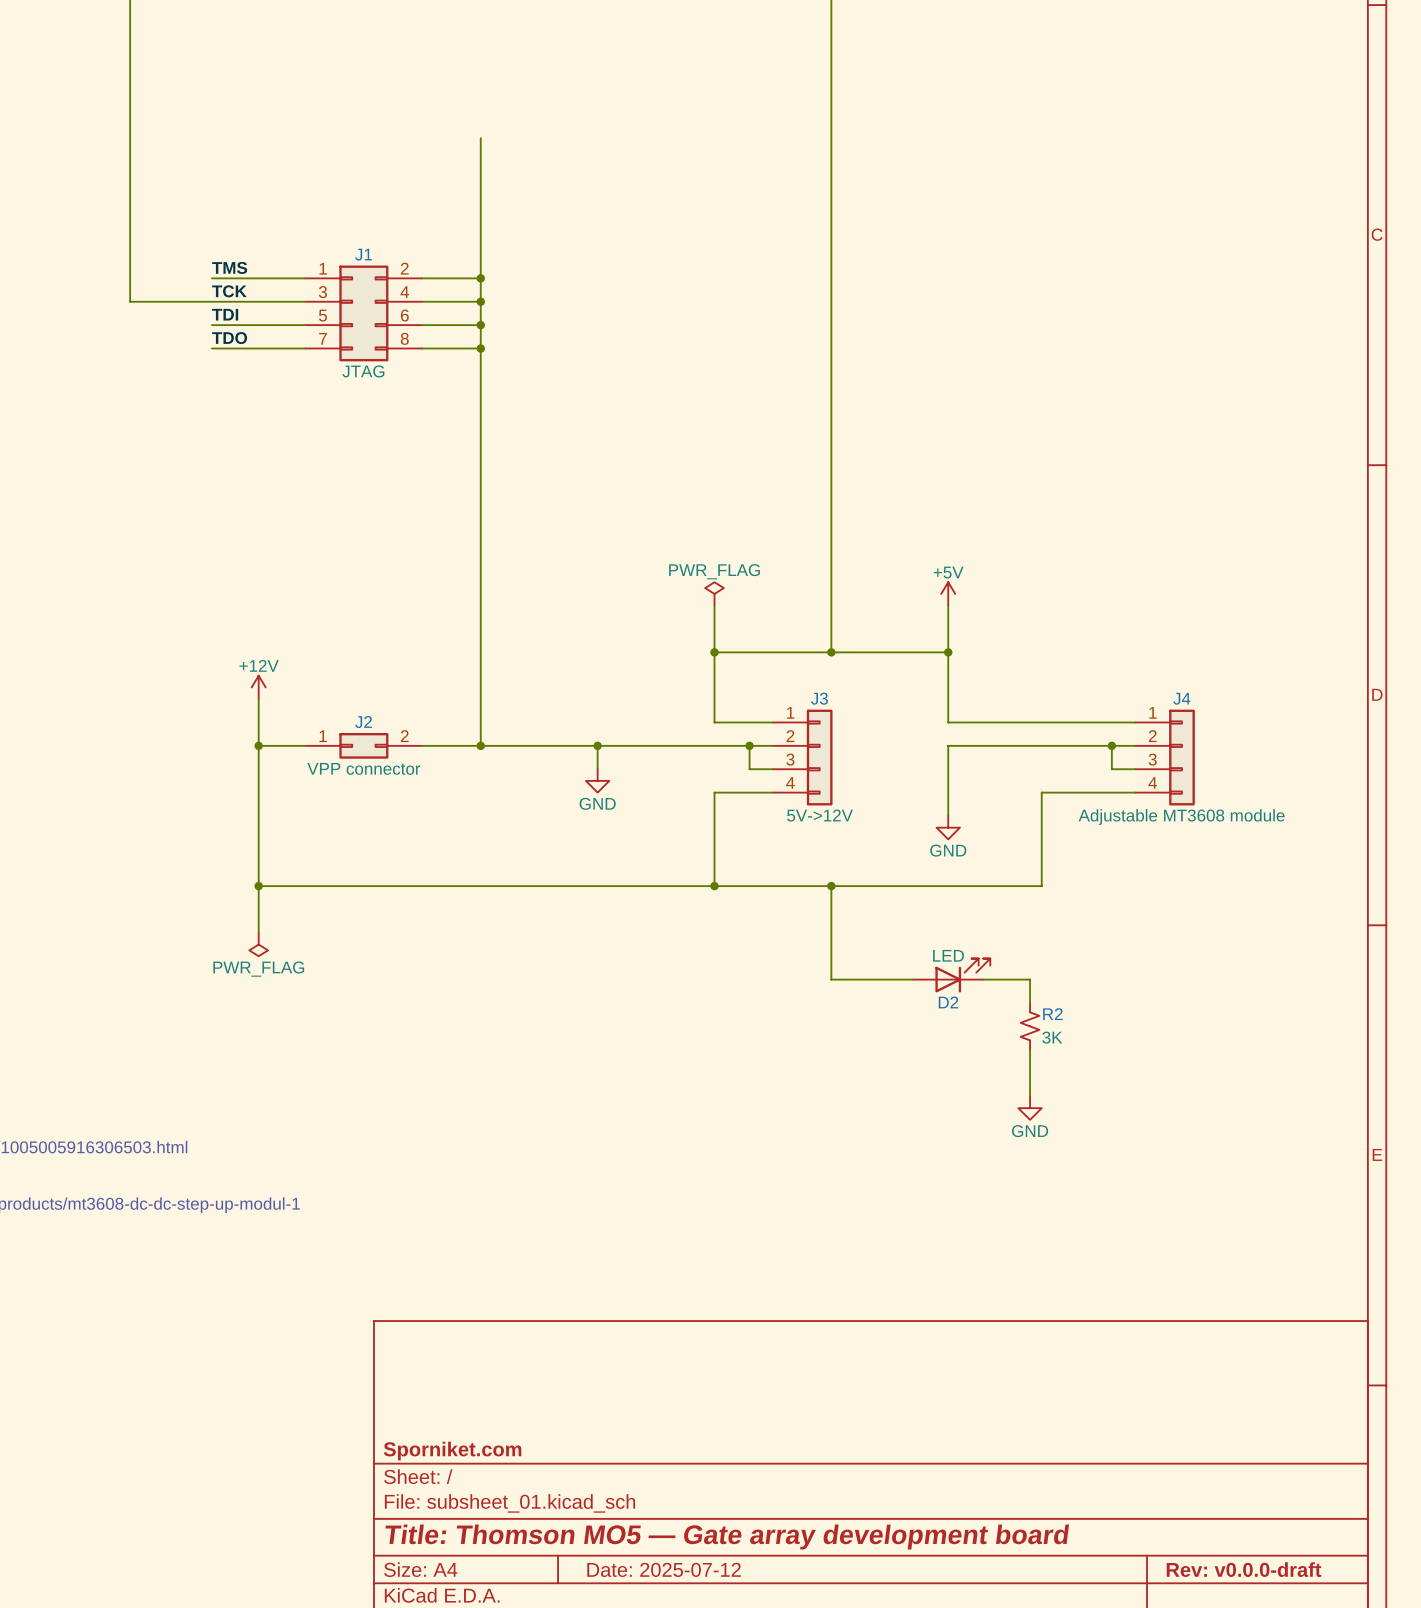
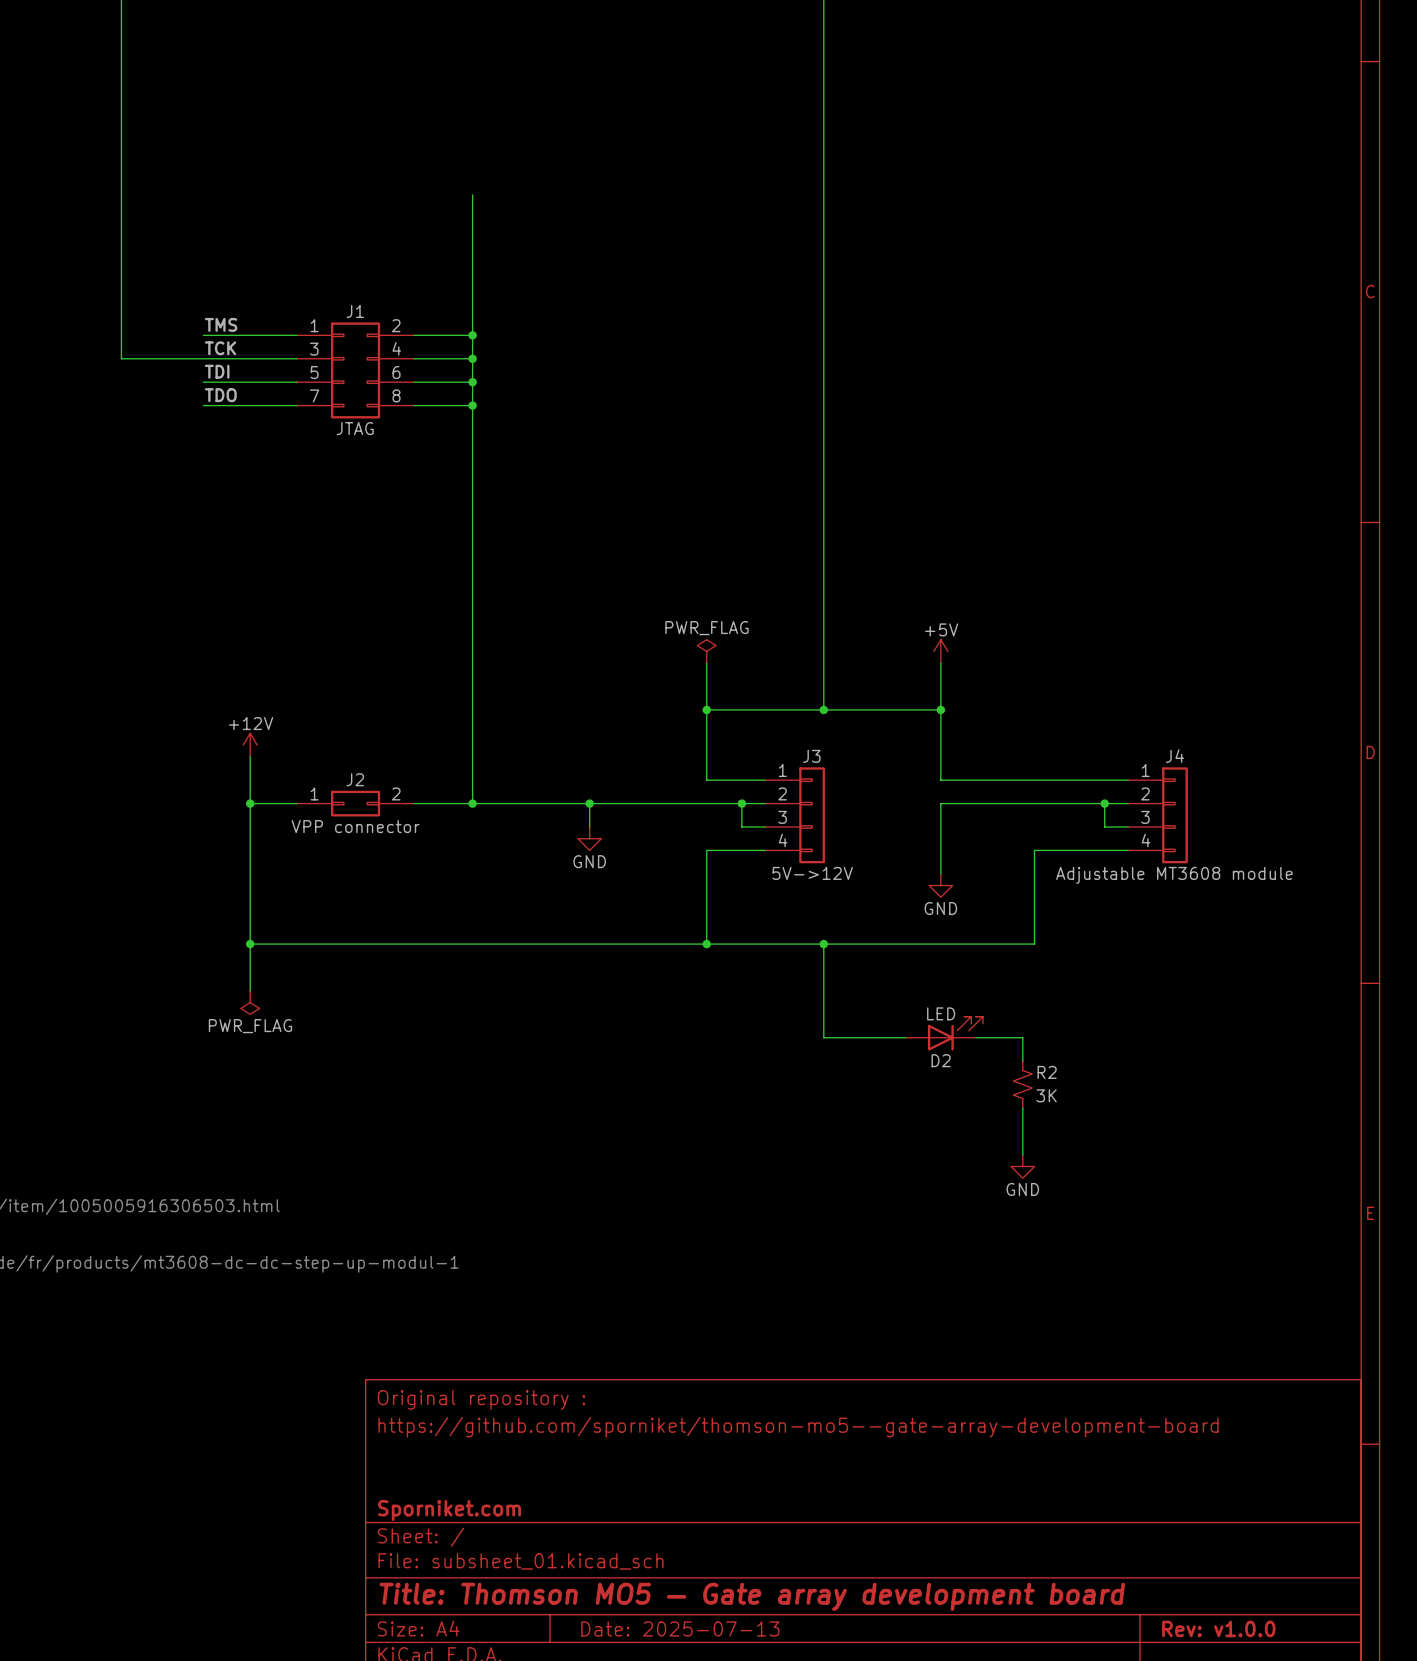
title block: none -> Original repository : (481, 1399)
title block: none -> https://github.com/sporniket/thomson-mo5--gate-array-development-board (798, 1427)
title block: Date: 2025-07-12 (664, 1569) -> Date: 2025-07-13 (680, 1628)
title block: Rev: v0.0.0-draft (1244, 1569) -> Rev: v1.0.0 (1218, 1628)

